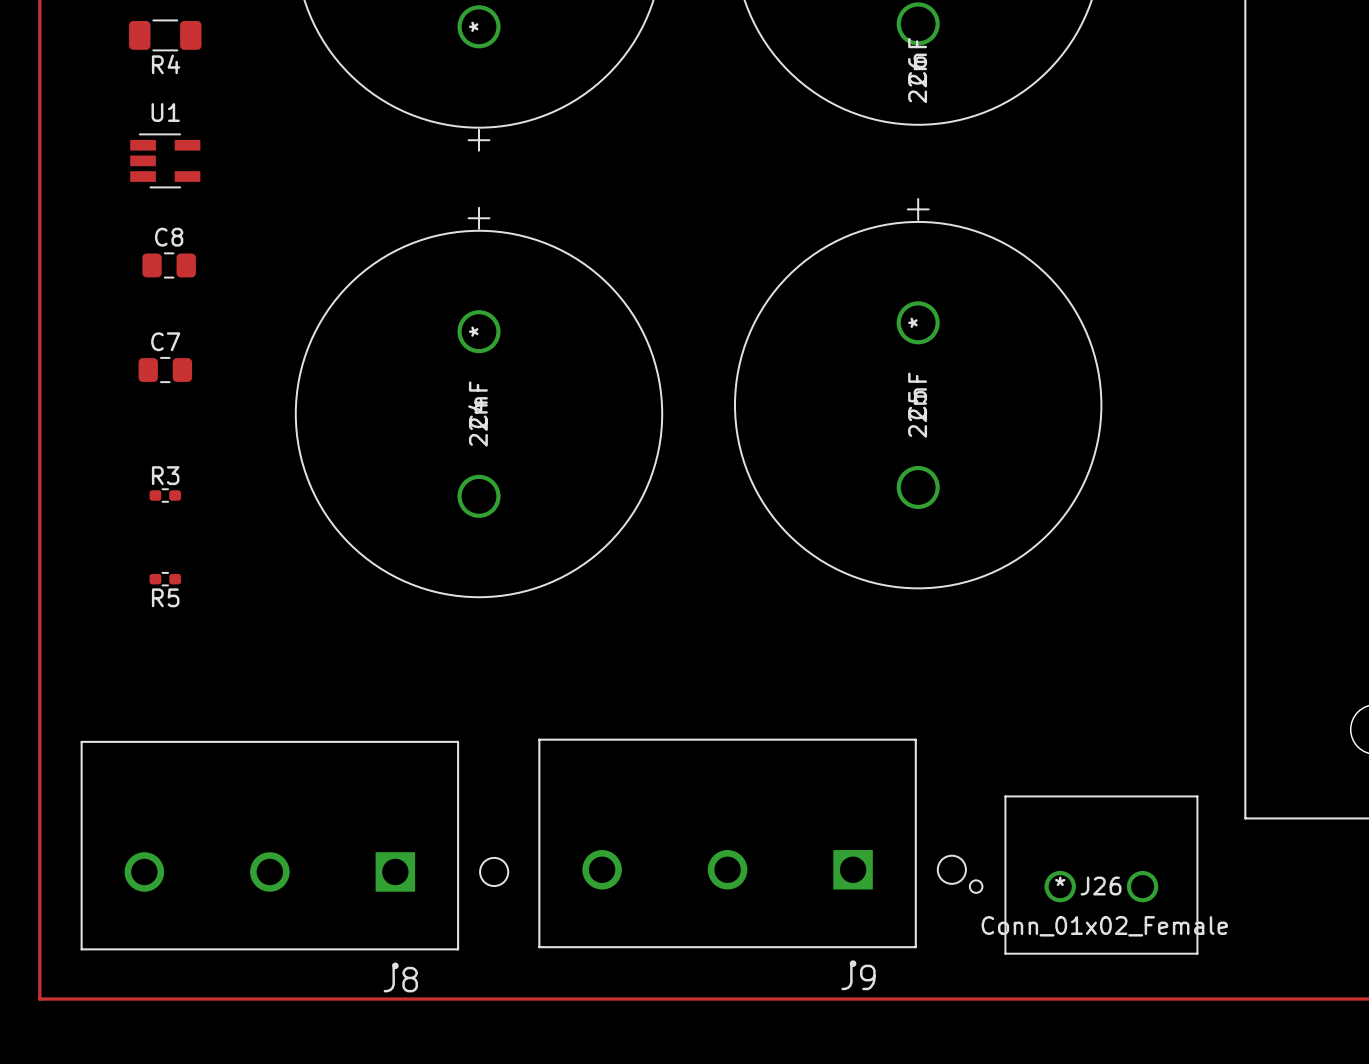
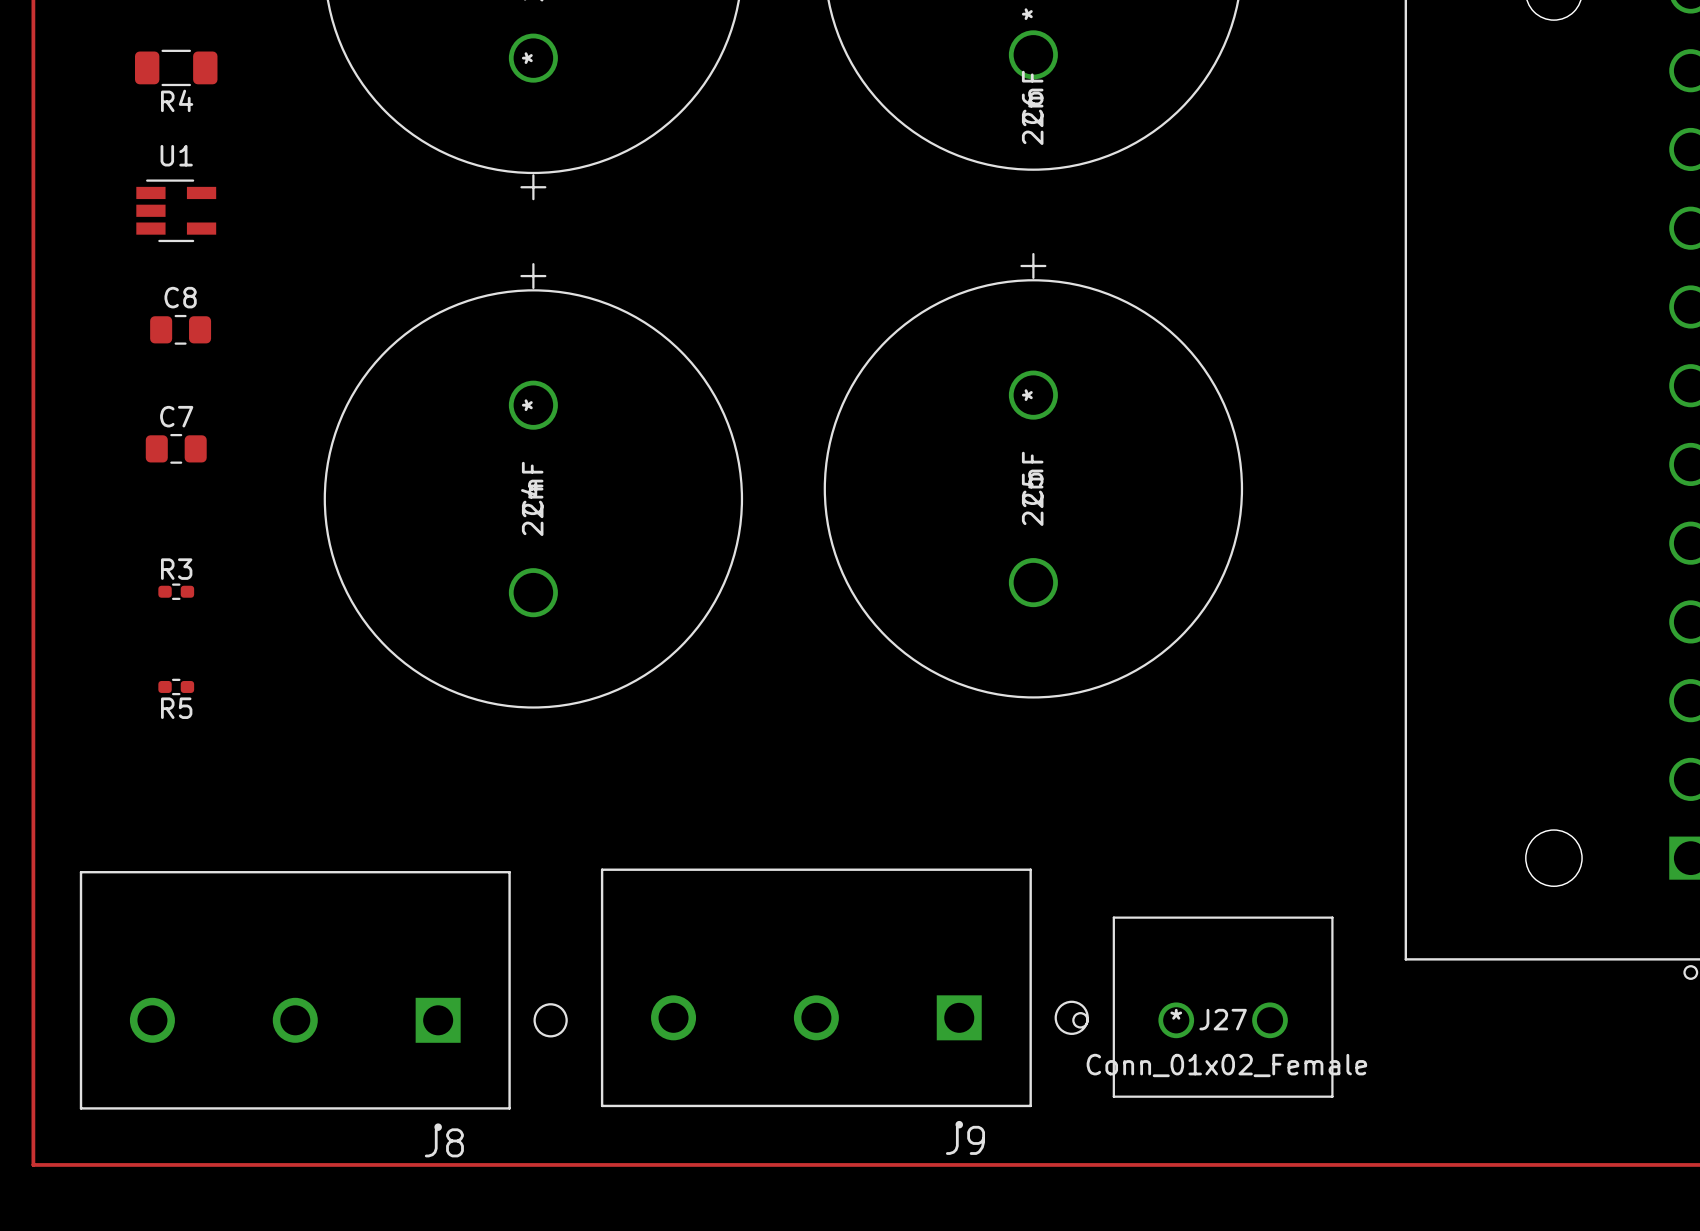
J27: none -> Conn_01x02_Female (1202, 1007)
J26: Conn_01x02_Female (1083, 875) -> none

